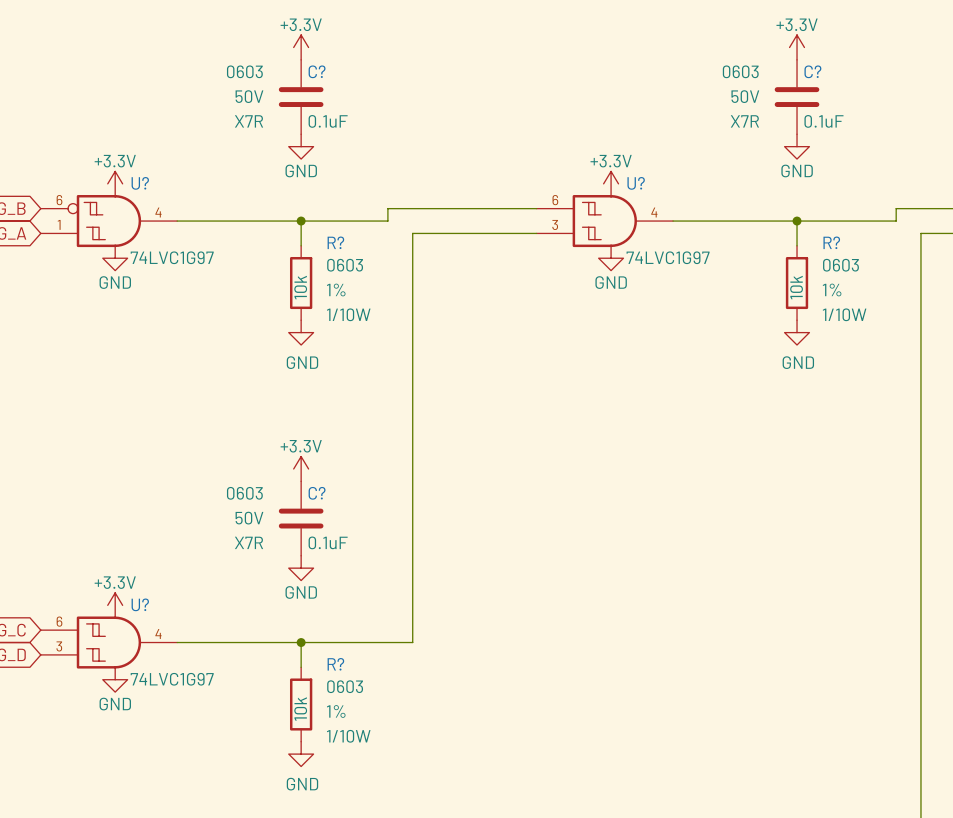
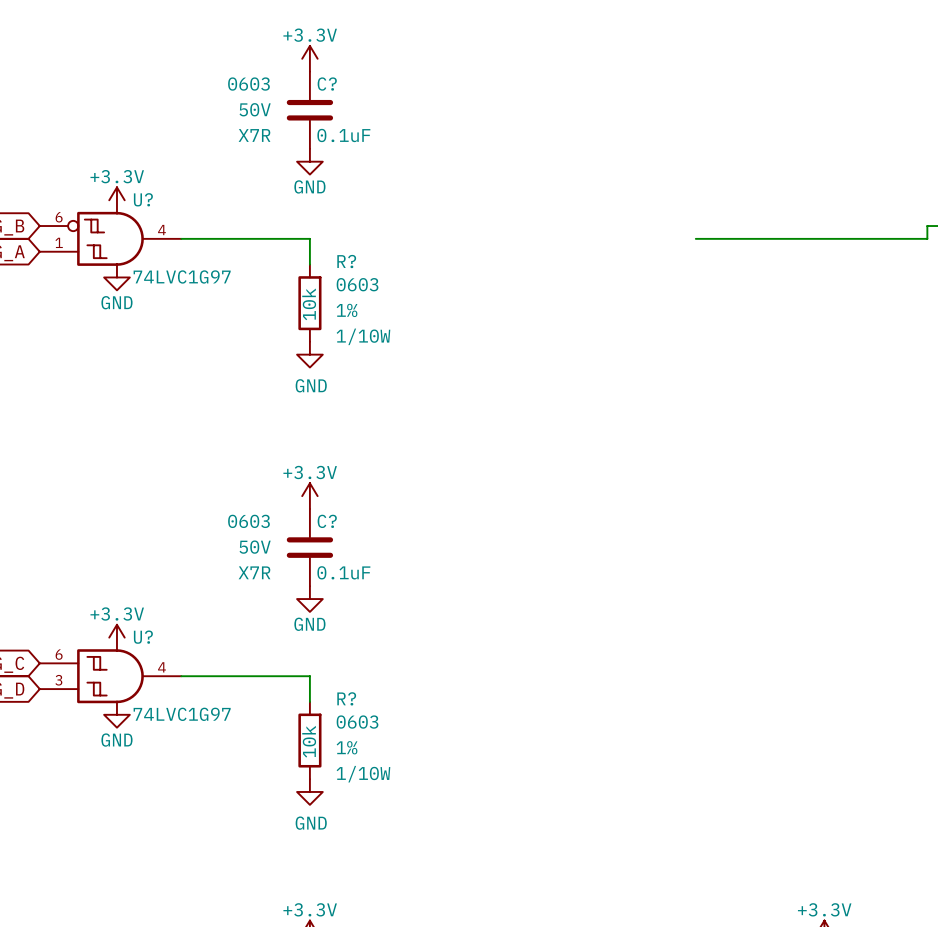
power symbol: +3.3V (797, 47) -> none
C?: 0.1uF (797, 97) -> none
power symbol: GND (797, 146) -> none
power symbol: +3.3V (611, 183) -> none
wire: (536, 208) (387, 208) (387, 221) (301, 221) -> none
junction: (301, 221) -> none
U?: 74LVC1G97 (604, 221) -> none
wire: (797, 221) (797, 245) -> none
junction: (797, 221) -> none
wire: (536, 233) (412, 233) (412, 642) (301, 642) -> none
power symbol: GND (611, 258) -> none
R?: 10k (797, 283) -> none
power symbol: GND (797, 332) -> none
junction: (301, 642) -> none

